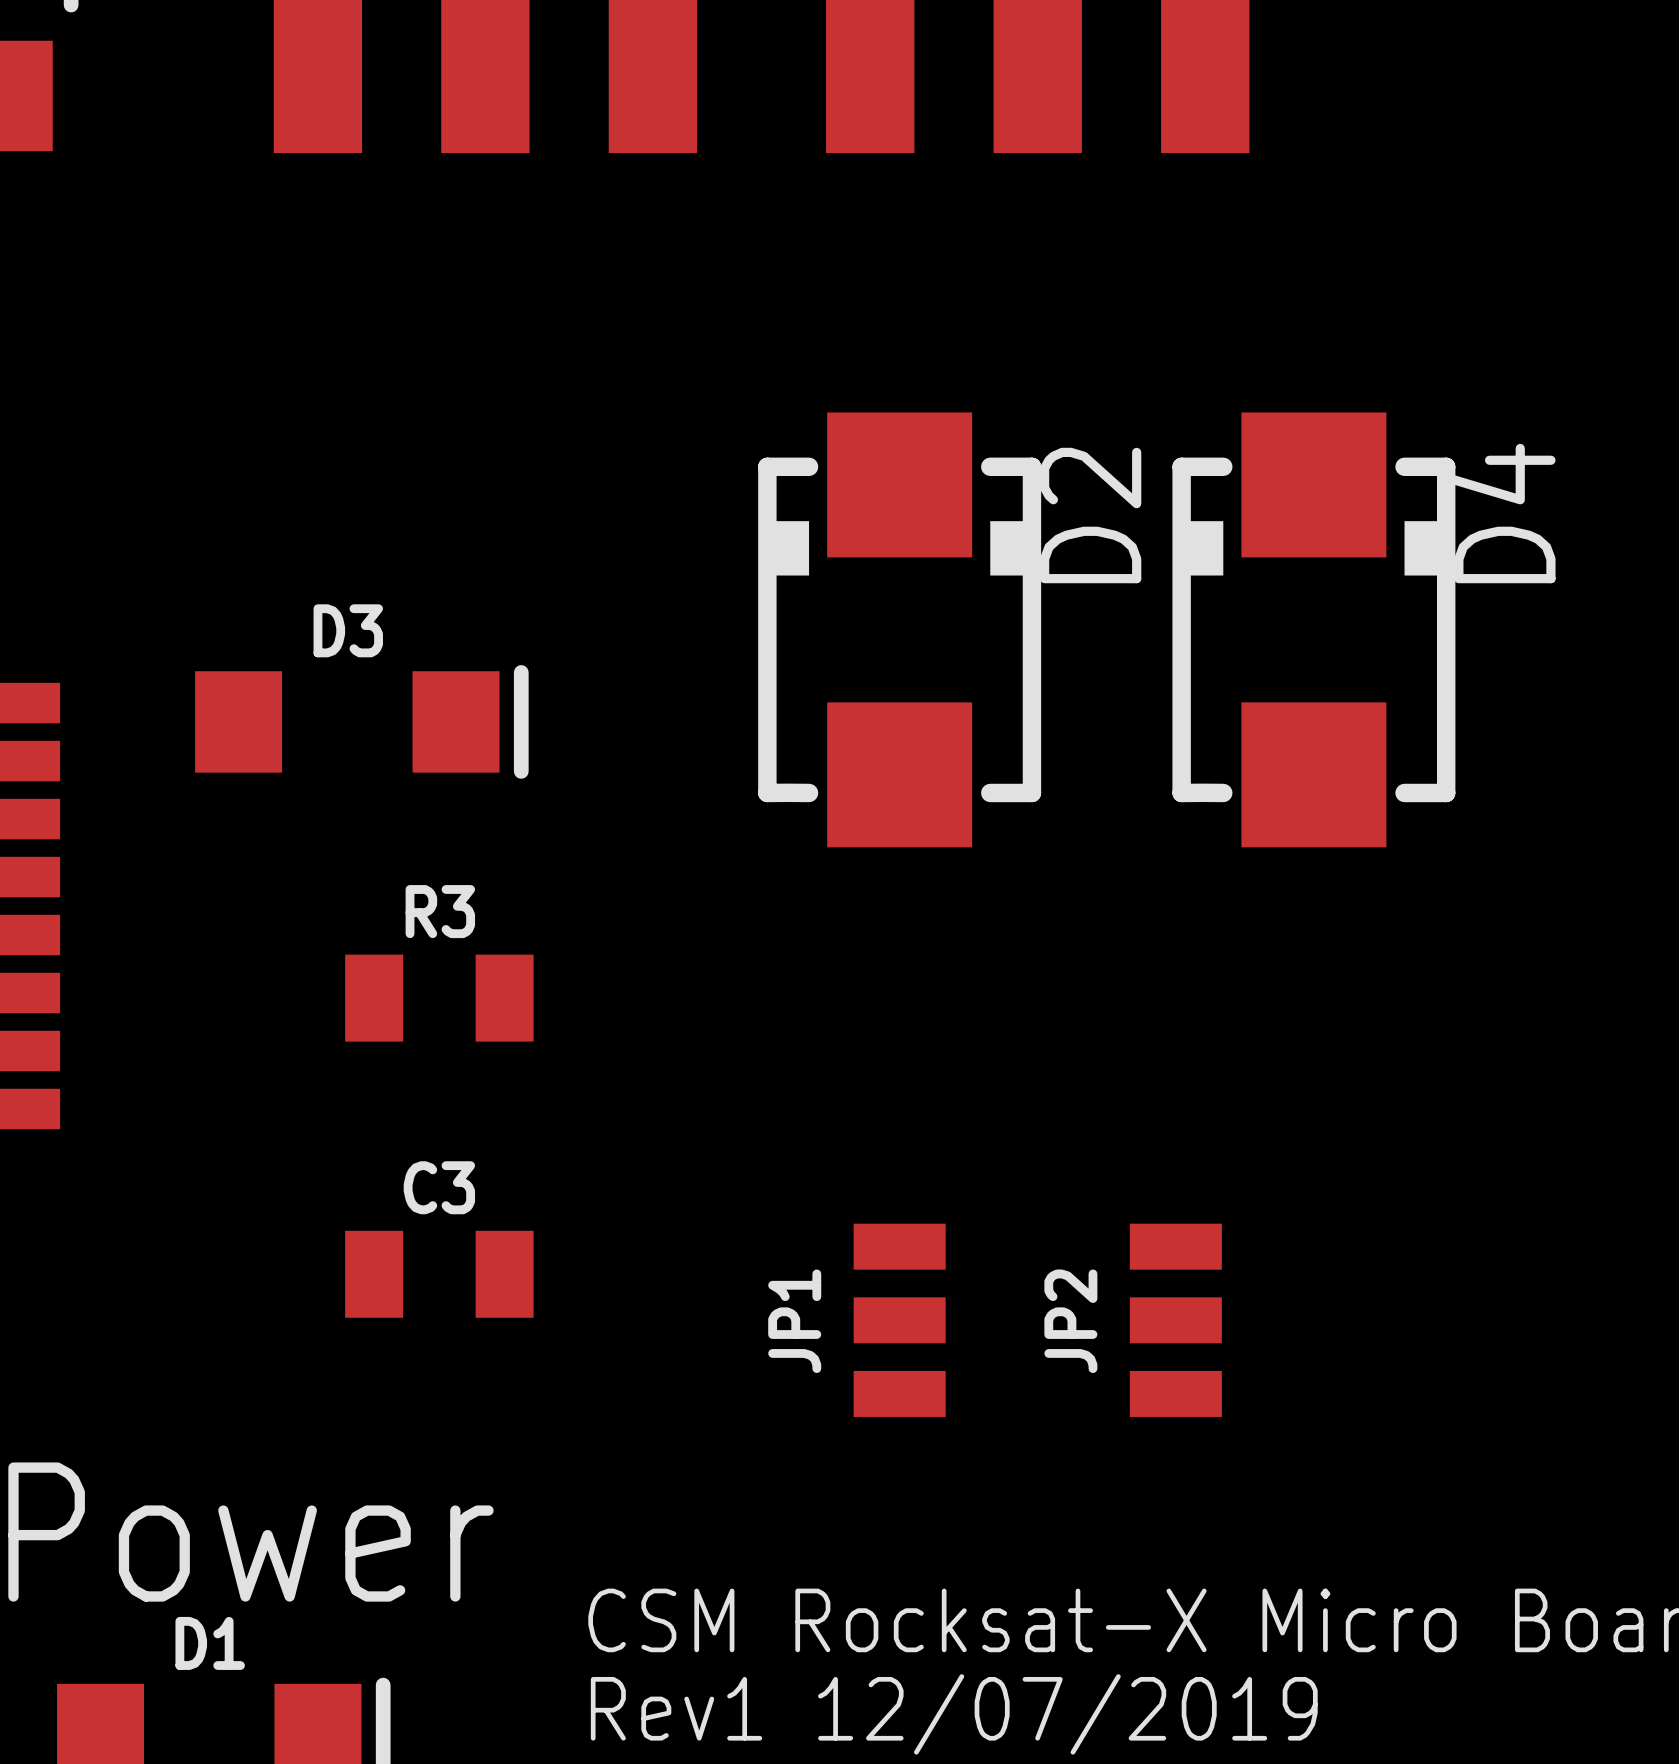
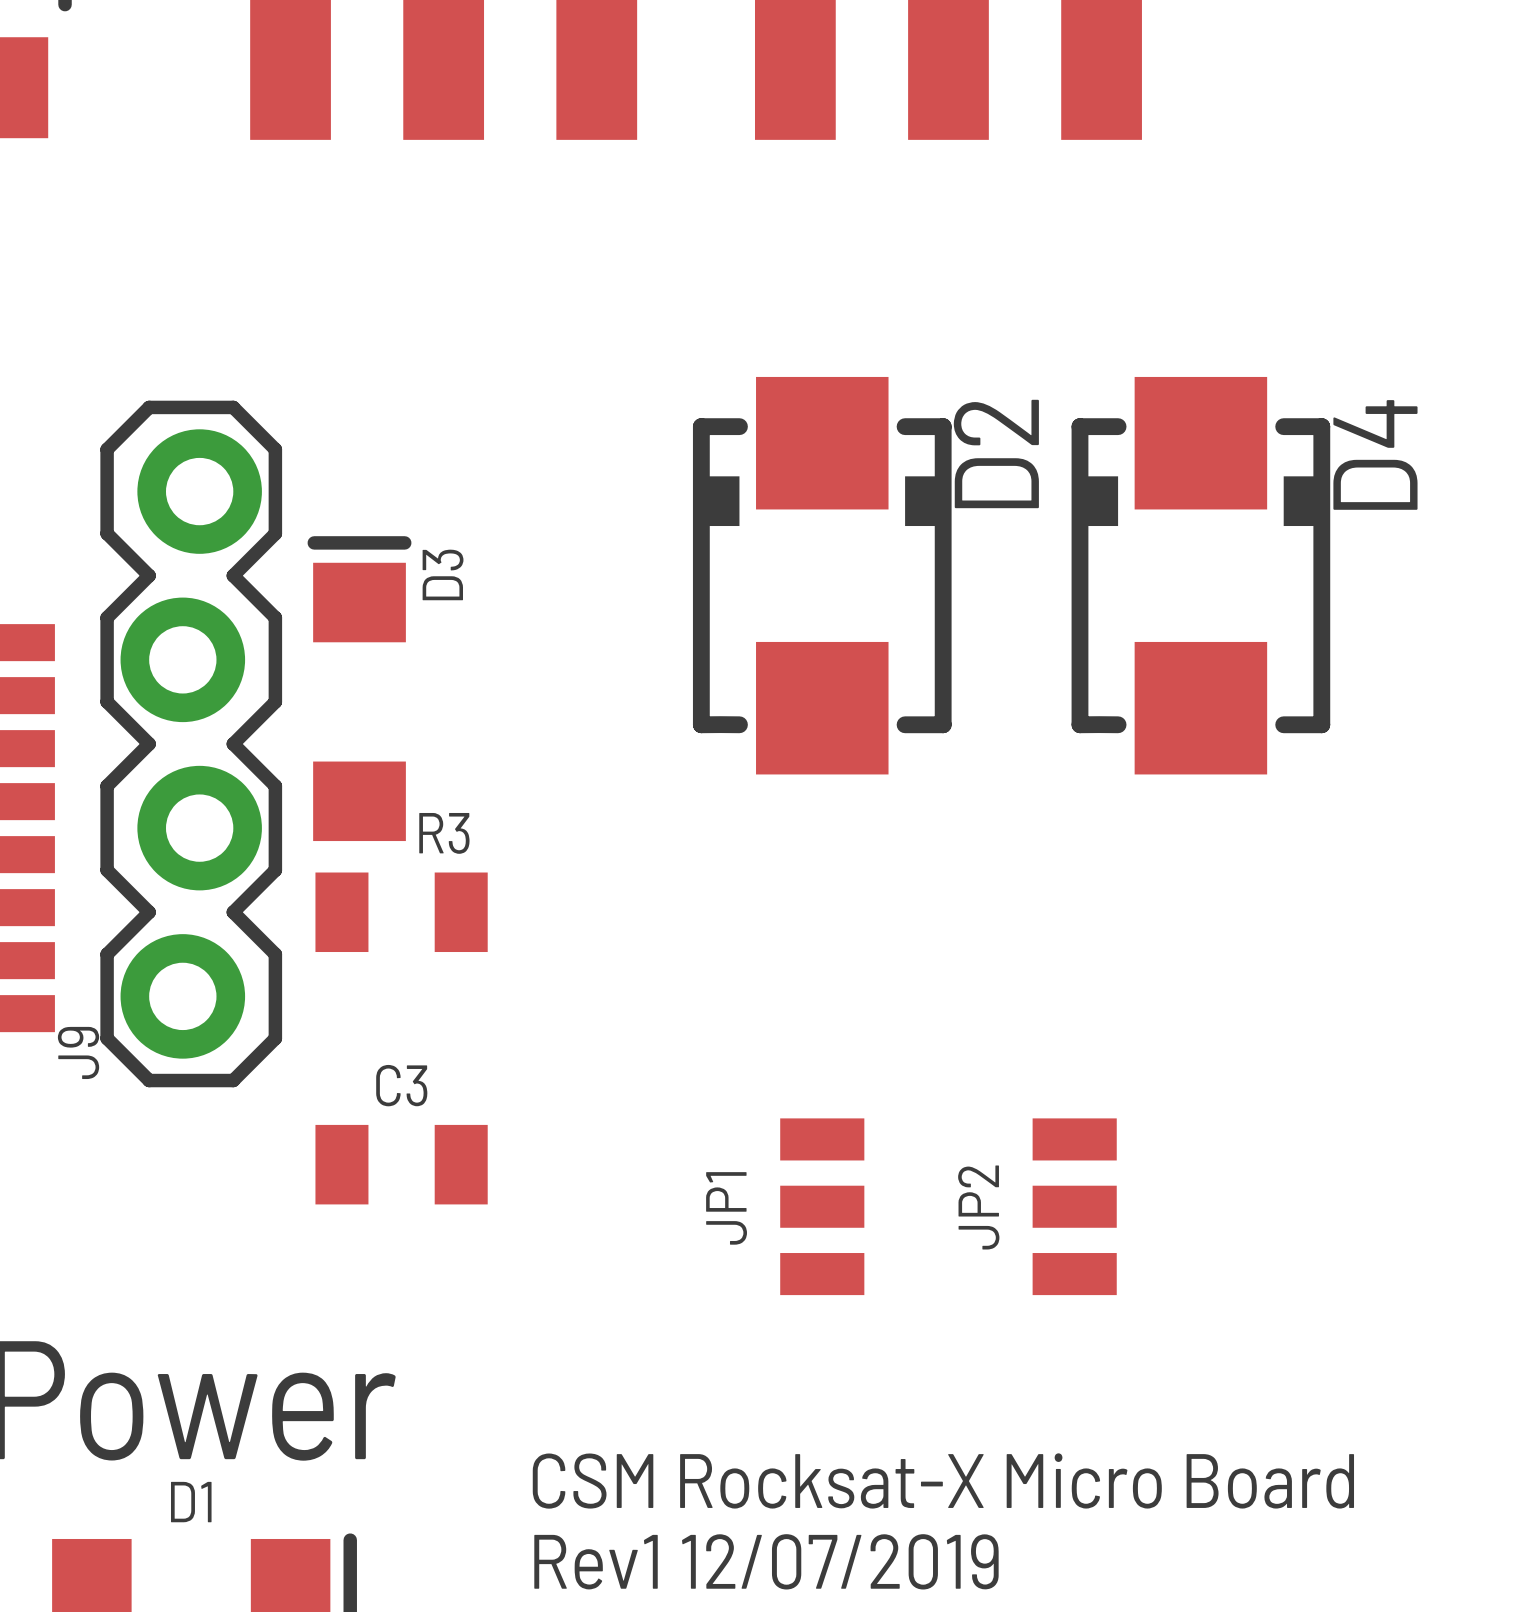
D3 rotation: 0° (361, 721) -> 90° counterclockwise (359, 688)
J9: none -> (191, 743)
R3 name position: R3 (440, 911) -> R3 (444, 833)

